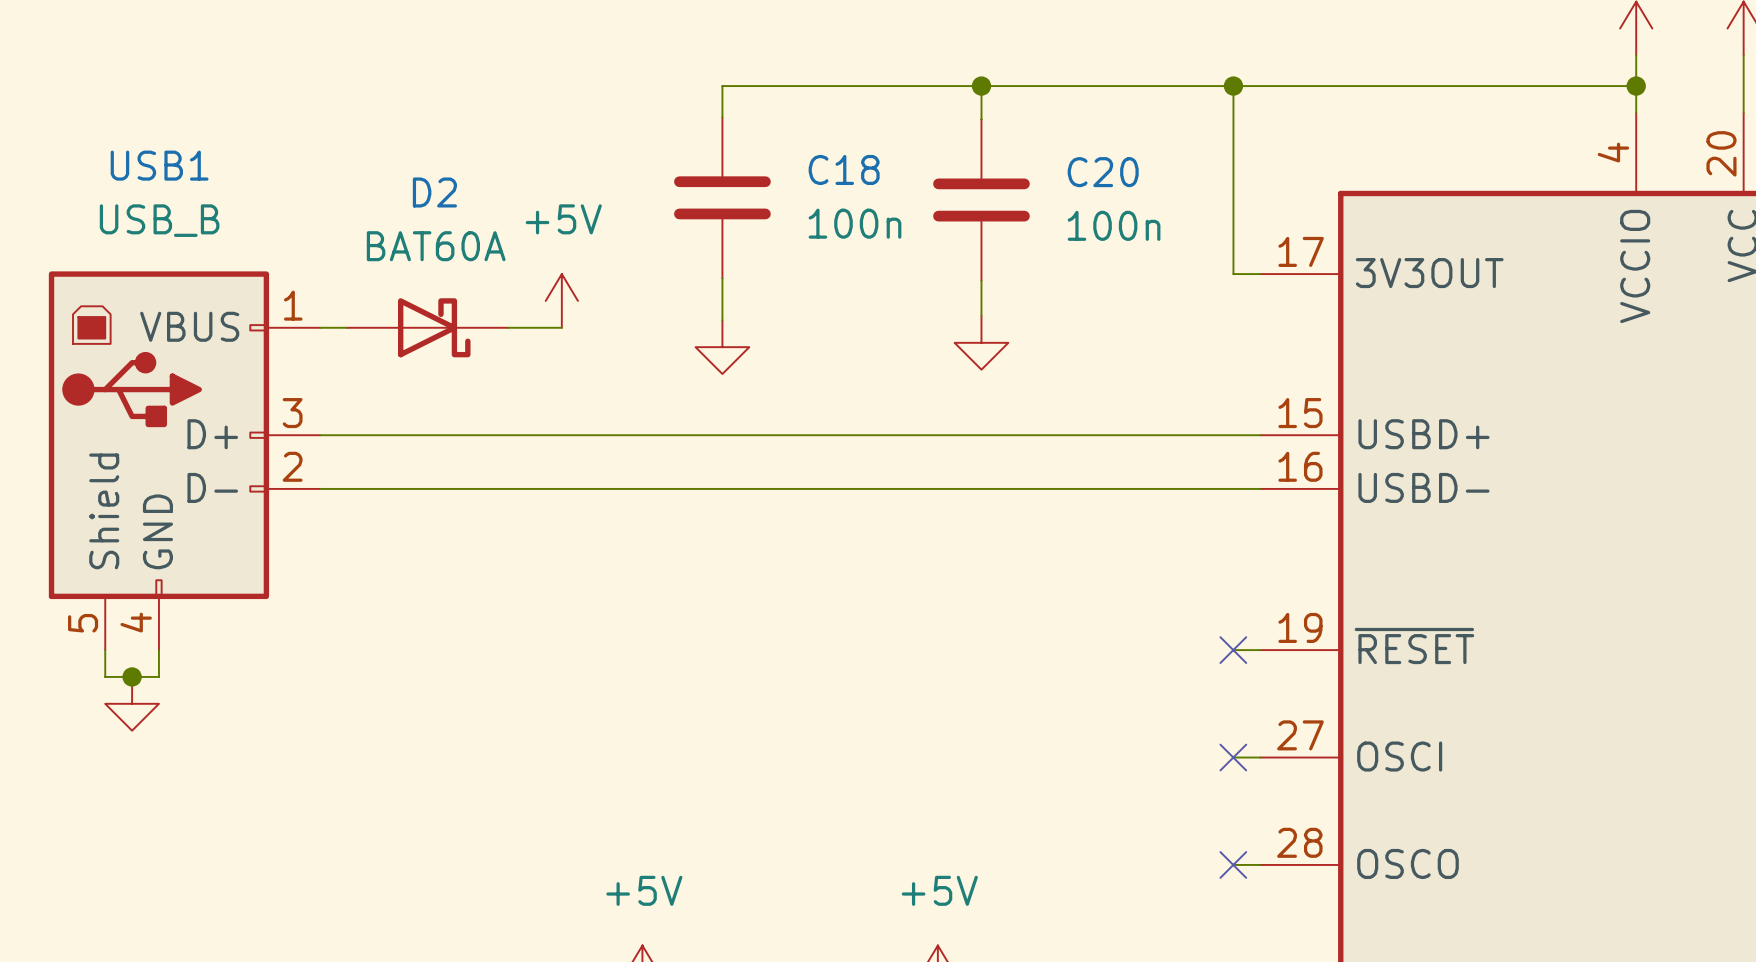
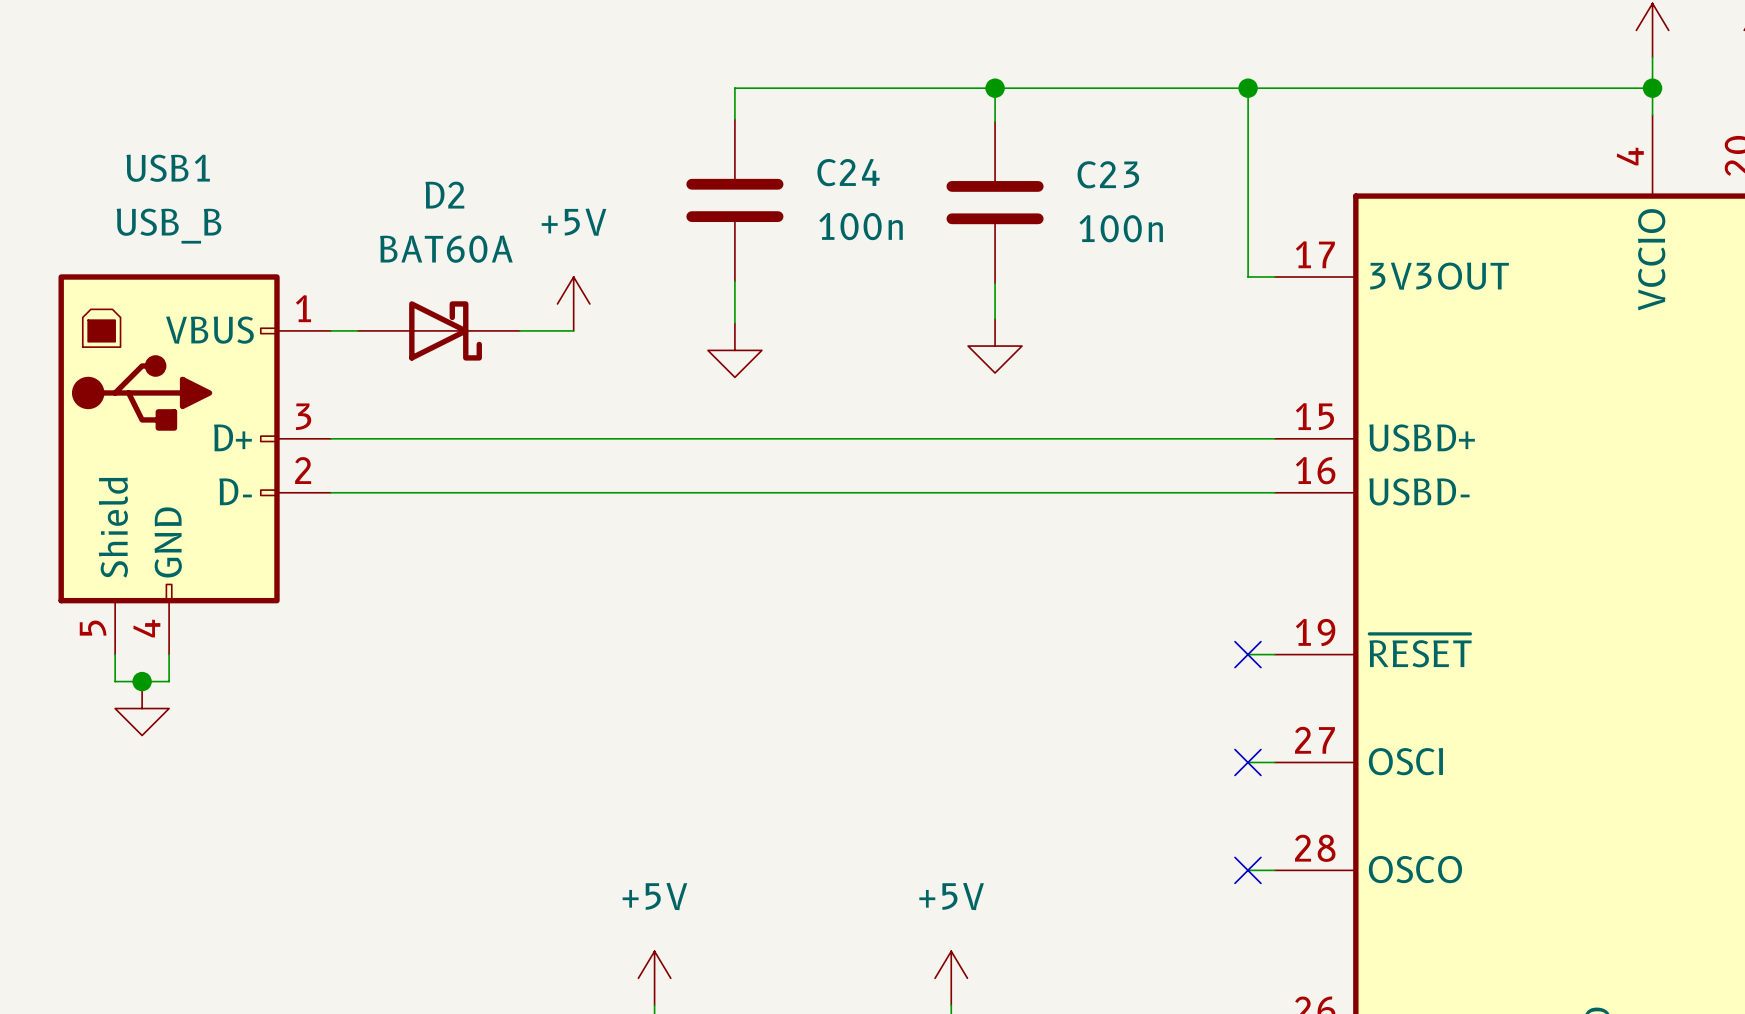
C18 name: C18 (844, 169) -> C24 (848, 172)
C20 name: C20 (1103, 172) -> C23 (1108, 174)

